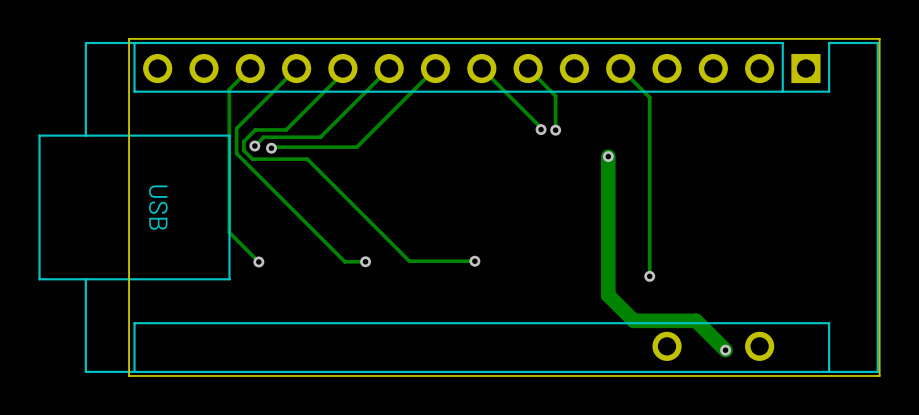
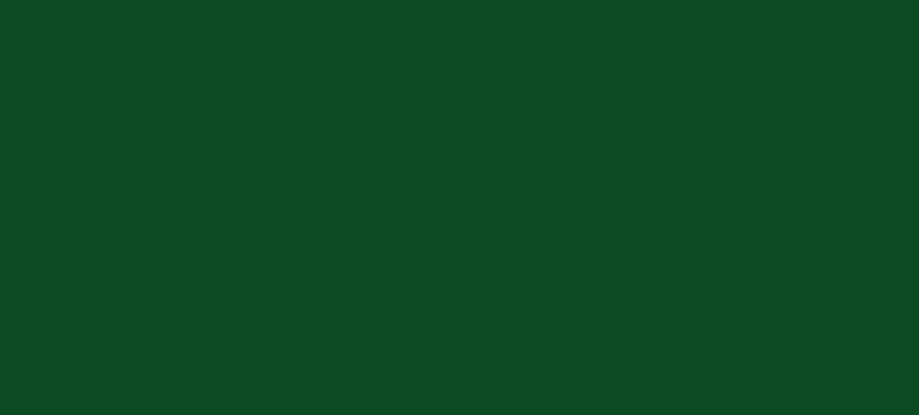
board edge: (879, 38) (129, 38) (129, 375) (879, 375) (879, 38) -> none
track: (250, 68) (229, 89) (229, 232) (258, 261) -> none
track: (296, 68) (236, 128) (236, 153) (344, 261) (365, 261) -> none
track: (342, 68) (342, 73) (286, 129) (255, 129) (243, 141) (243, 150) (252, 159) (307, 159) (409, 261) (474, 261) -> none
track: (389, 68) (320, 137) (263, 137) (254, 146) -> none
track: (435, 68) (356, 147) (271, 148) (273, 147) -> none
track: (481, 68) (541, 129) -> none
track: (528, 68) (555, 96) (555, 130) -> none
track: (620, 68) (649, 97) (649, 276) -> none
via: (541, 129) -> none
via: (555, 130) -> none
via: (254, 146) -> none
via: (271, 148) -> none
track: (608, 156) (608, 295) (633, 320) (696, 320) (725, 350) -> none
via: (608, 156) -> none
part: (458, 207) -> none
via: (258, 261) -> none
via: (365, 261) -> none
via: (474, 261) -> none
via: (649, 276) -> none
via: (725, 350) -> none

